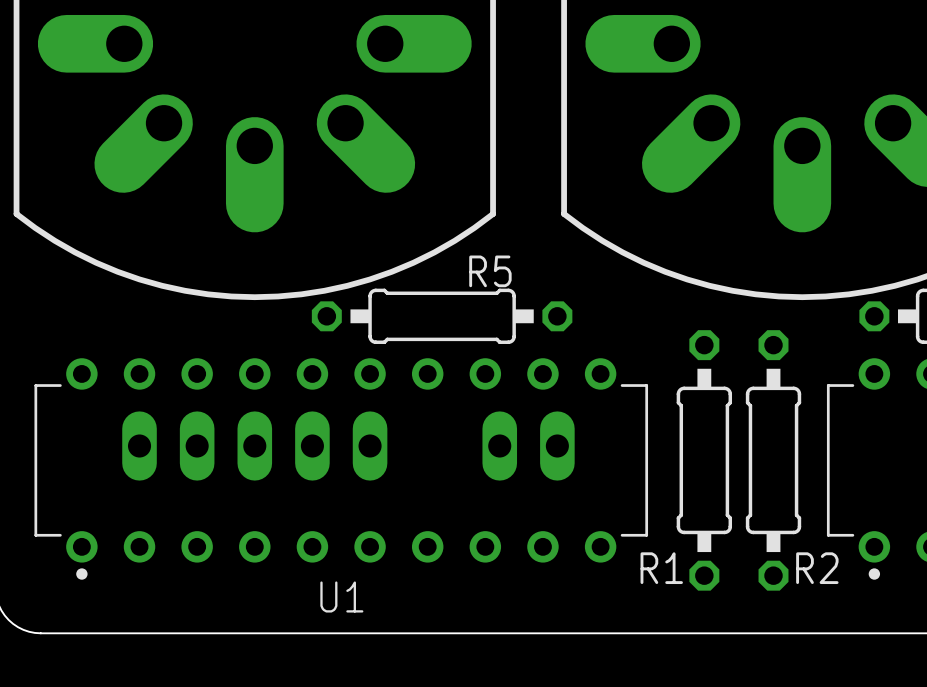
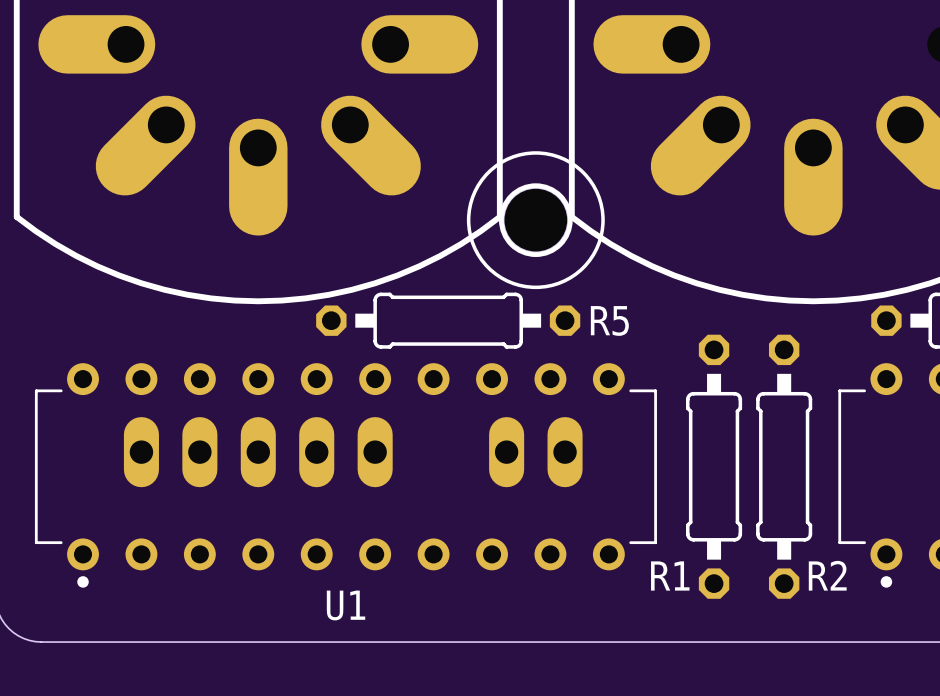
part: none -> (535, 220)
R5 name position: R5 (490, 271) -> R5 (609, 320)

